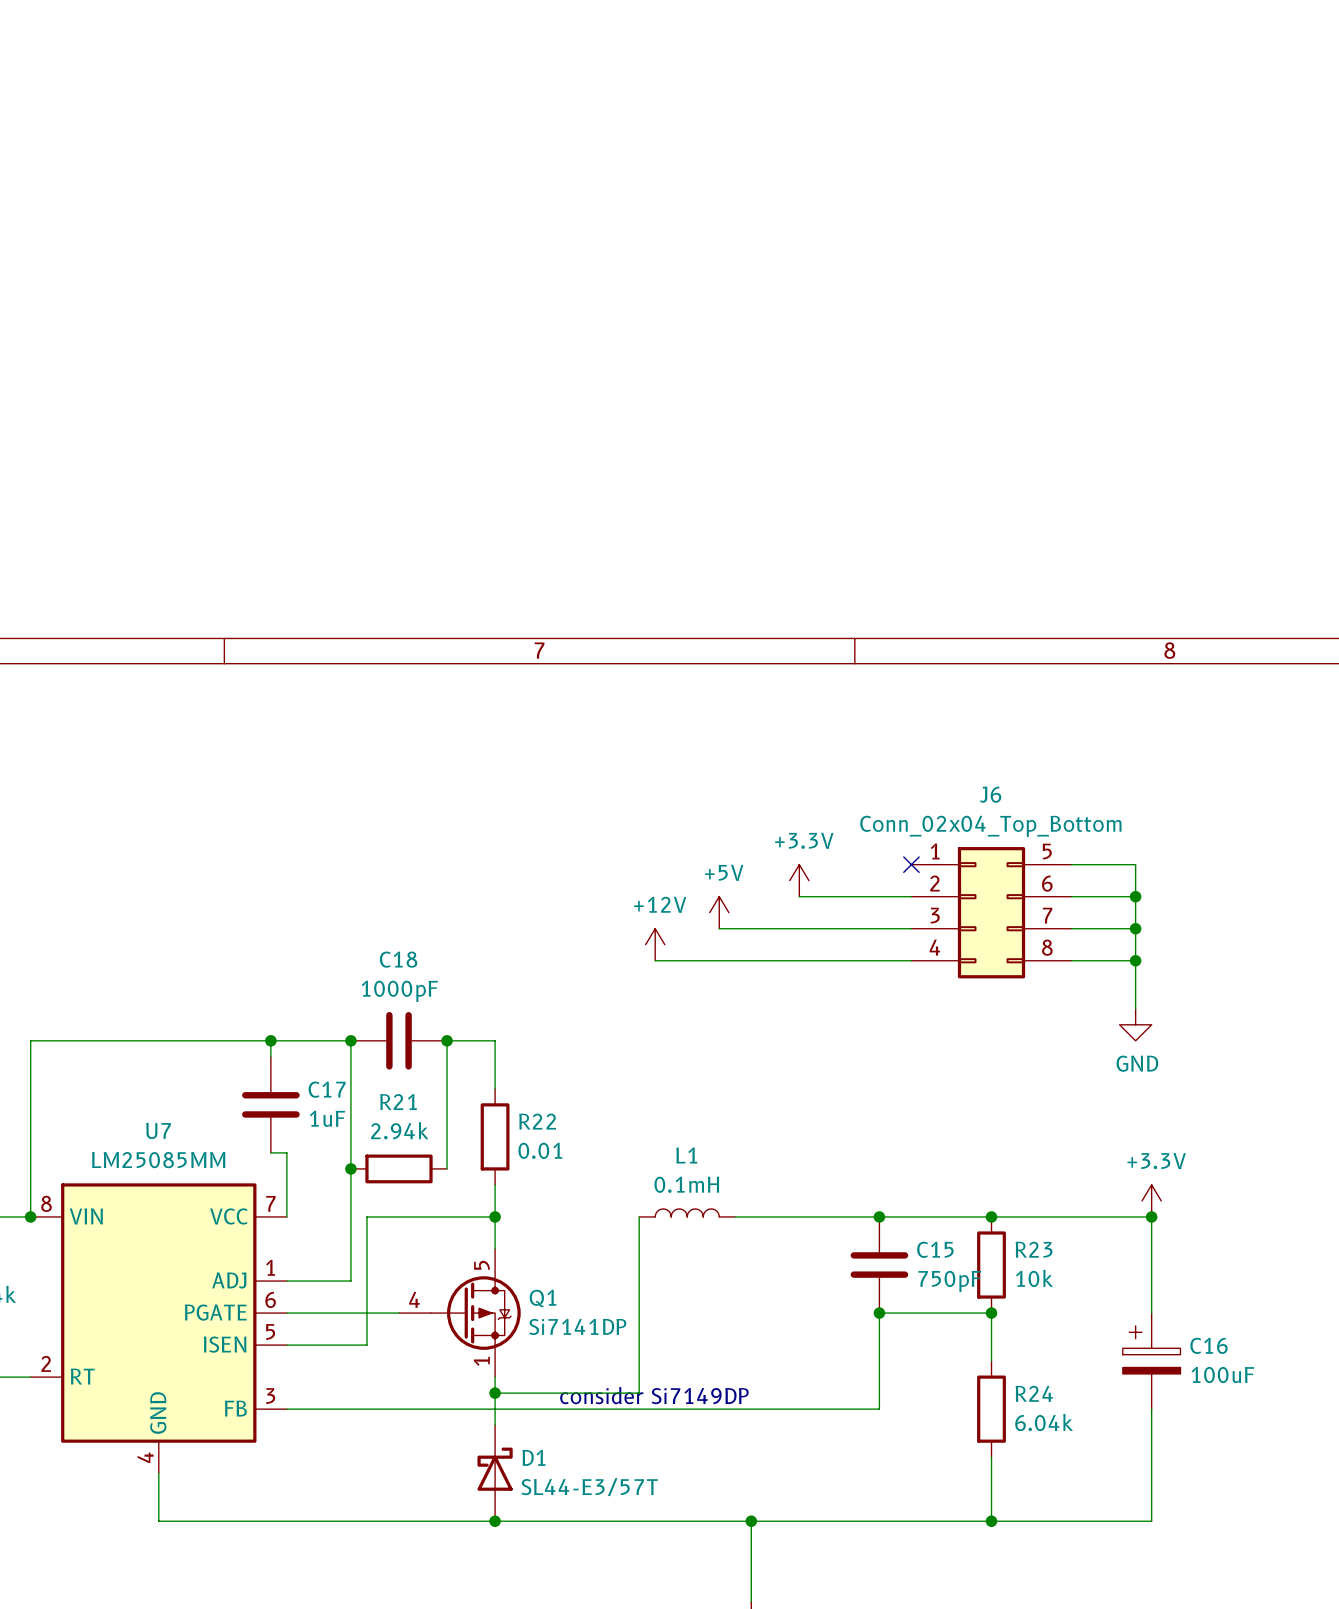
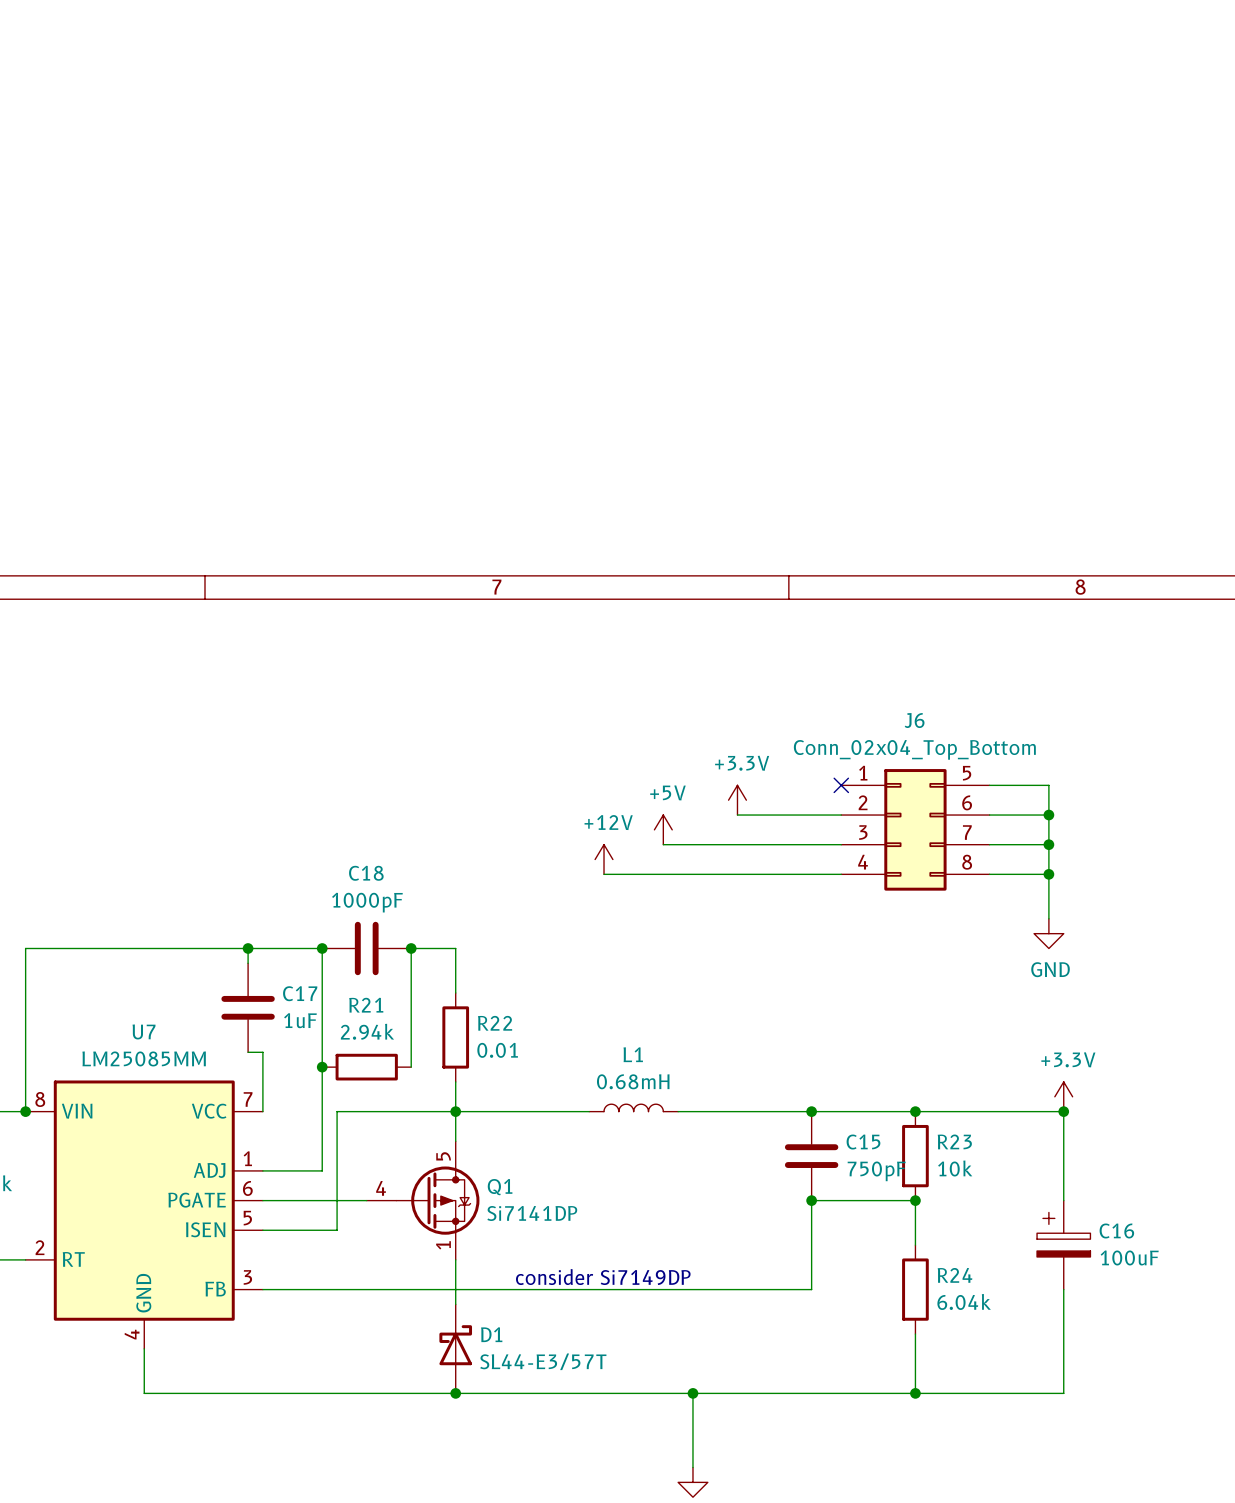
L1 value: 0.1mH (686, 1184) -> 0.68mH (633, 1081)
wire: (639, 1216) (639, 1393) (495, 1393) -> (589, 1111) (455, 1111)
junction: (495, 1393) -> none

